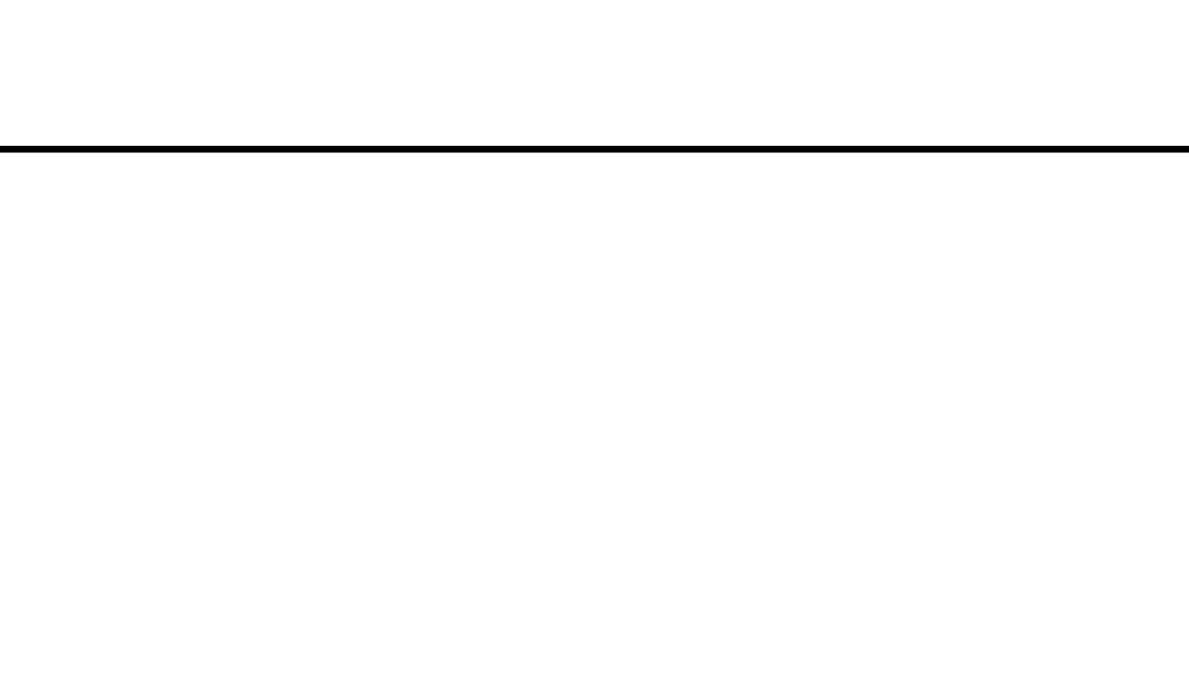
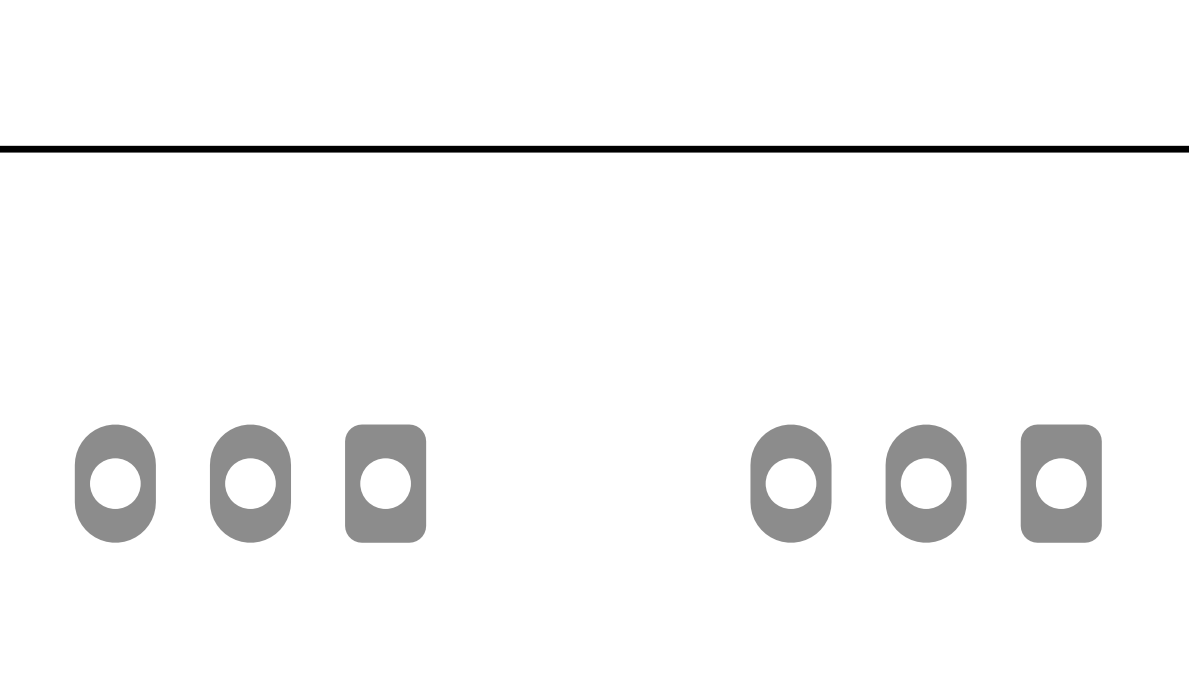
part: none -> (250, 483)
part: none -> (926, 483)

